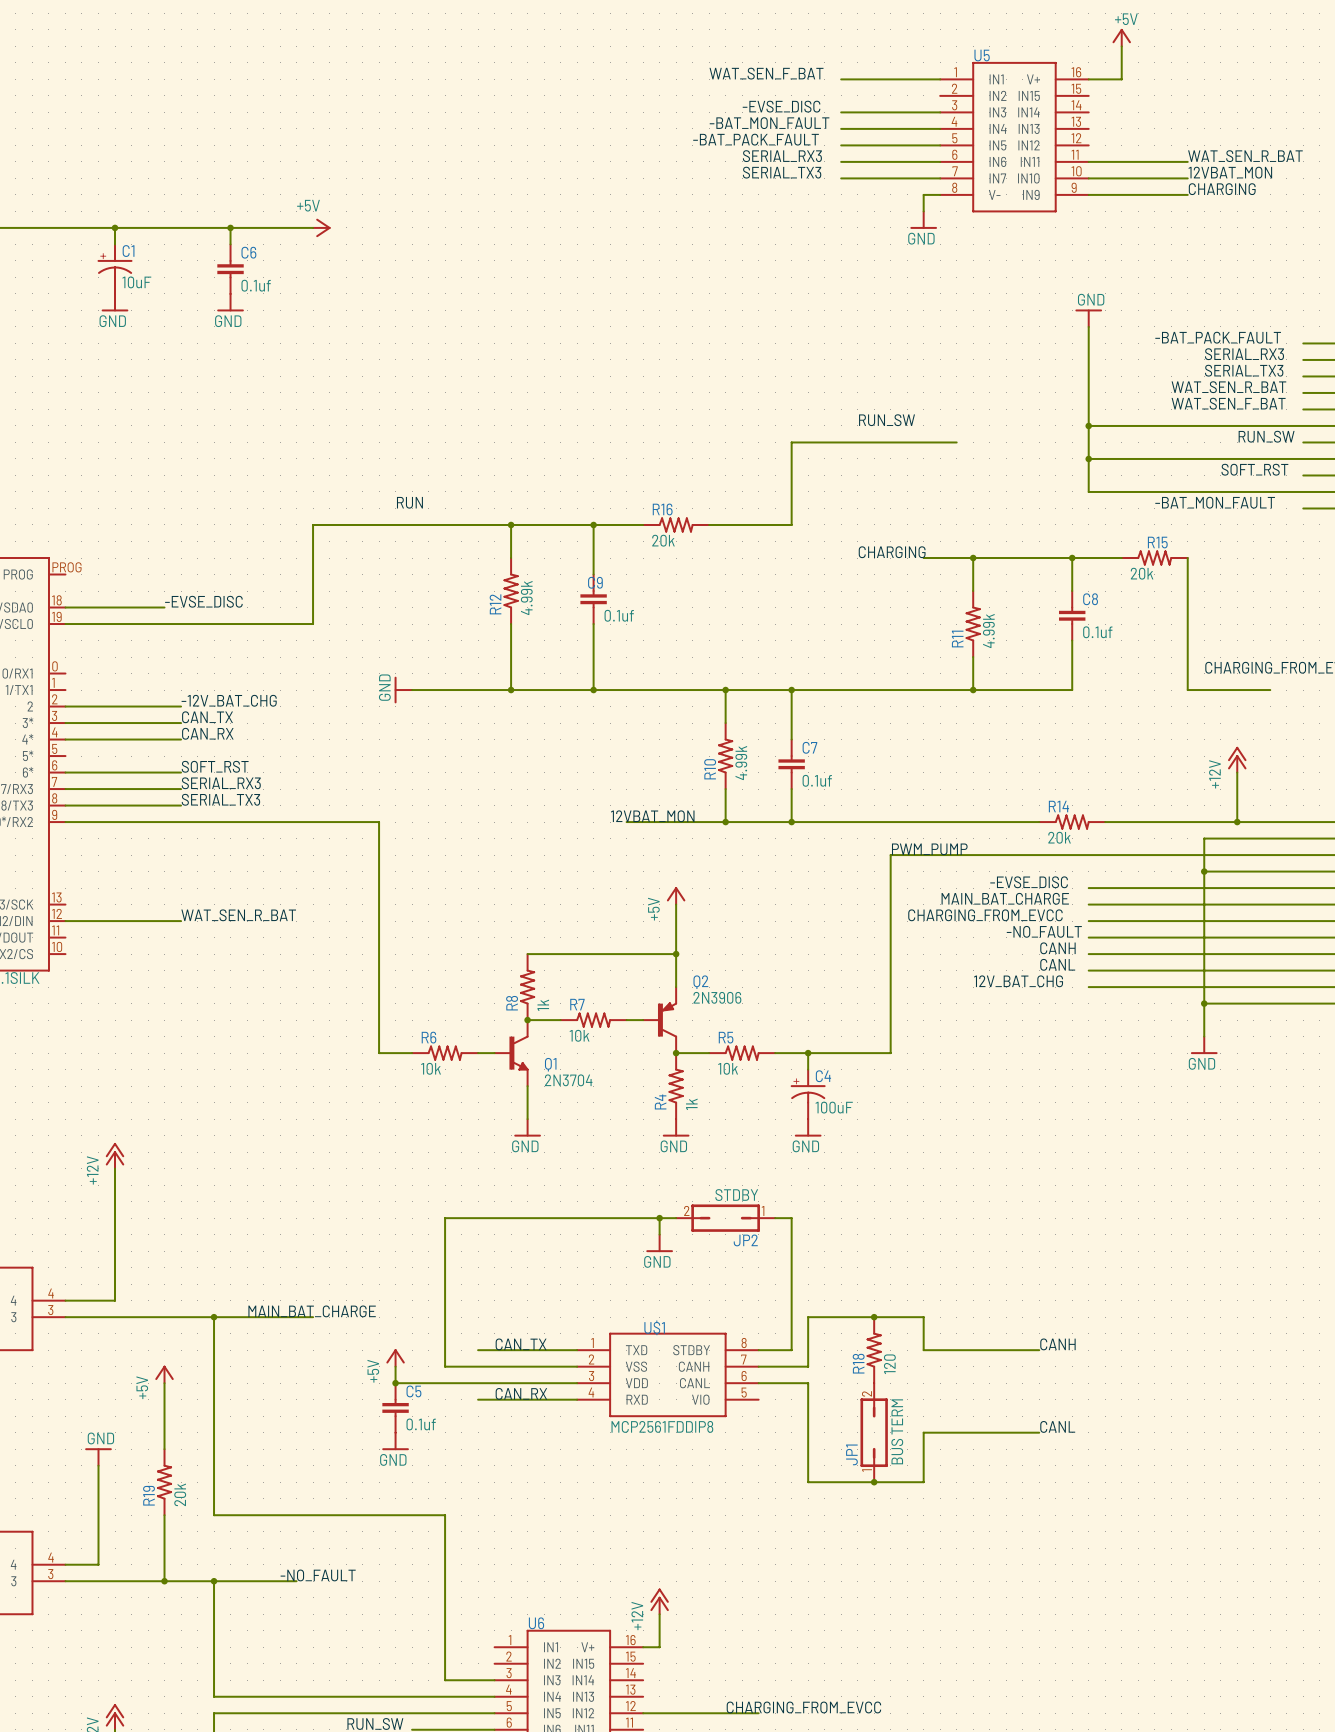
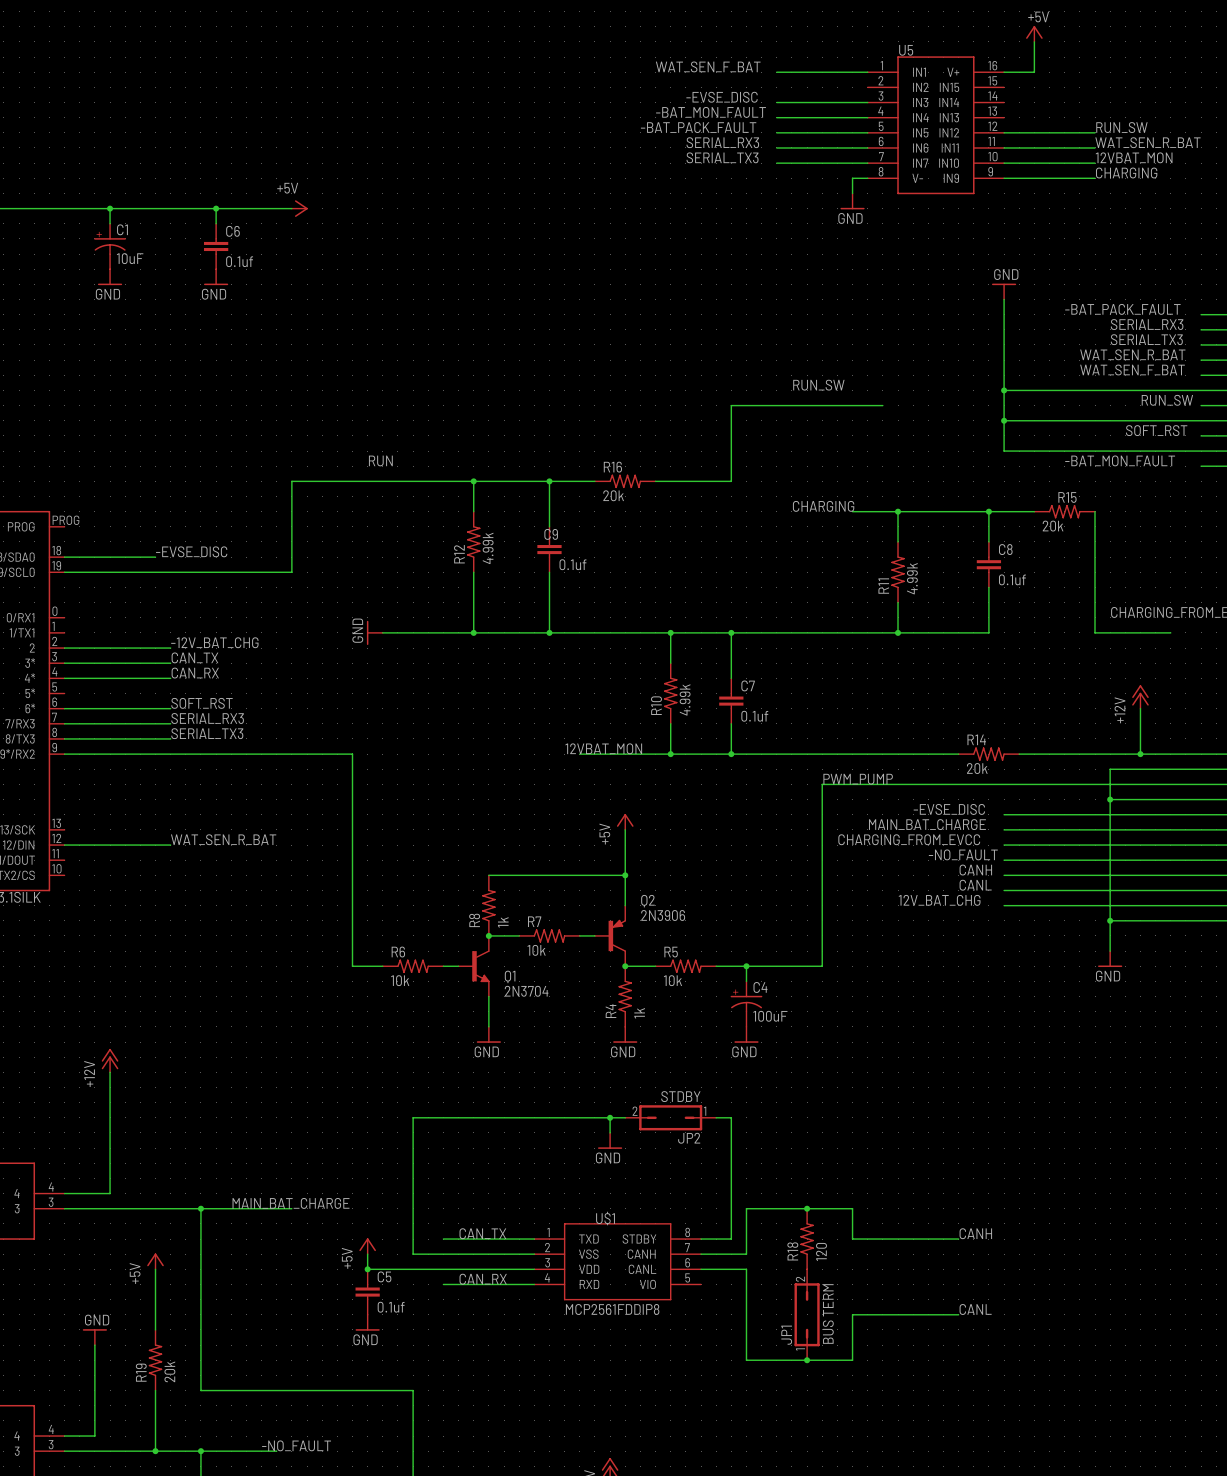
label: none -> RUN_SW (1121, 127)
wire: none -> (1004, 132) (1095, 132)

